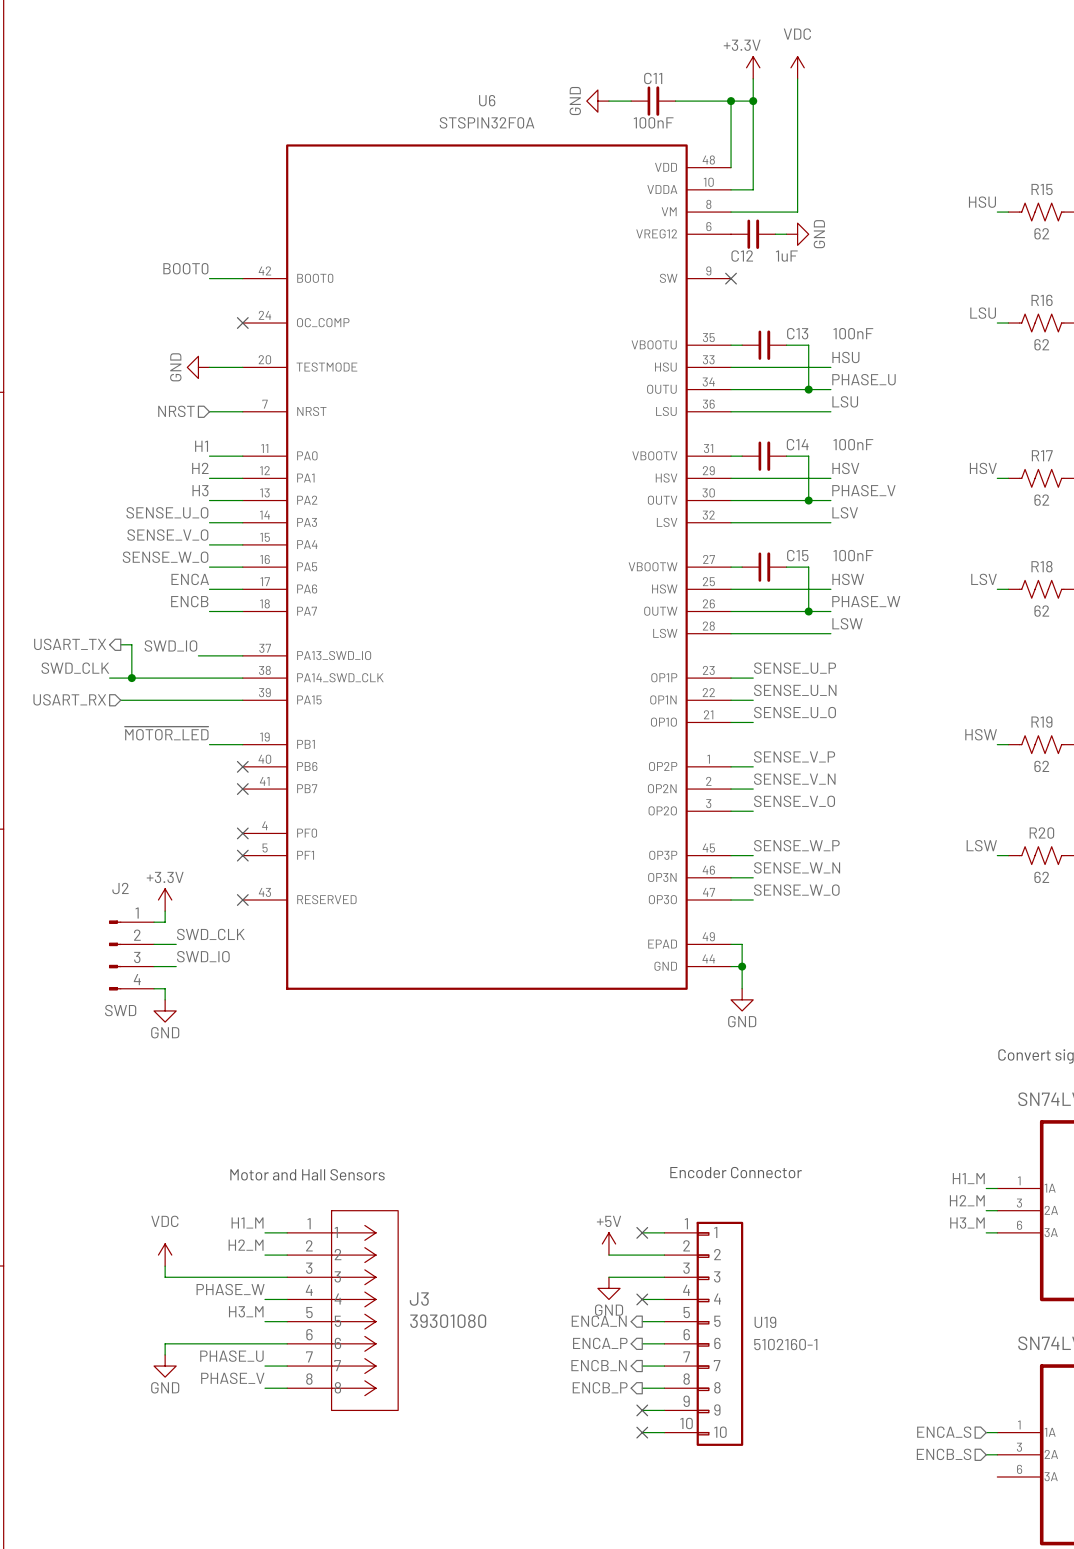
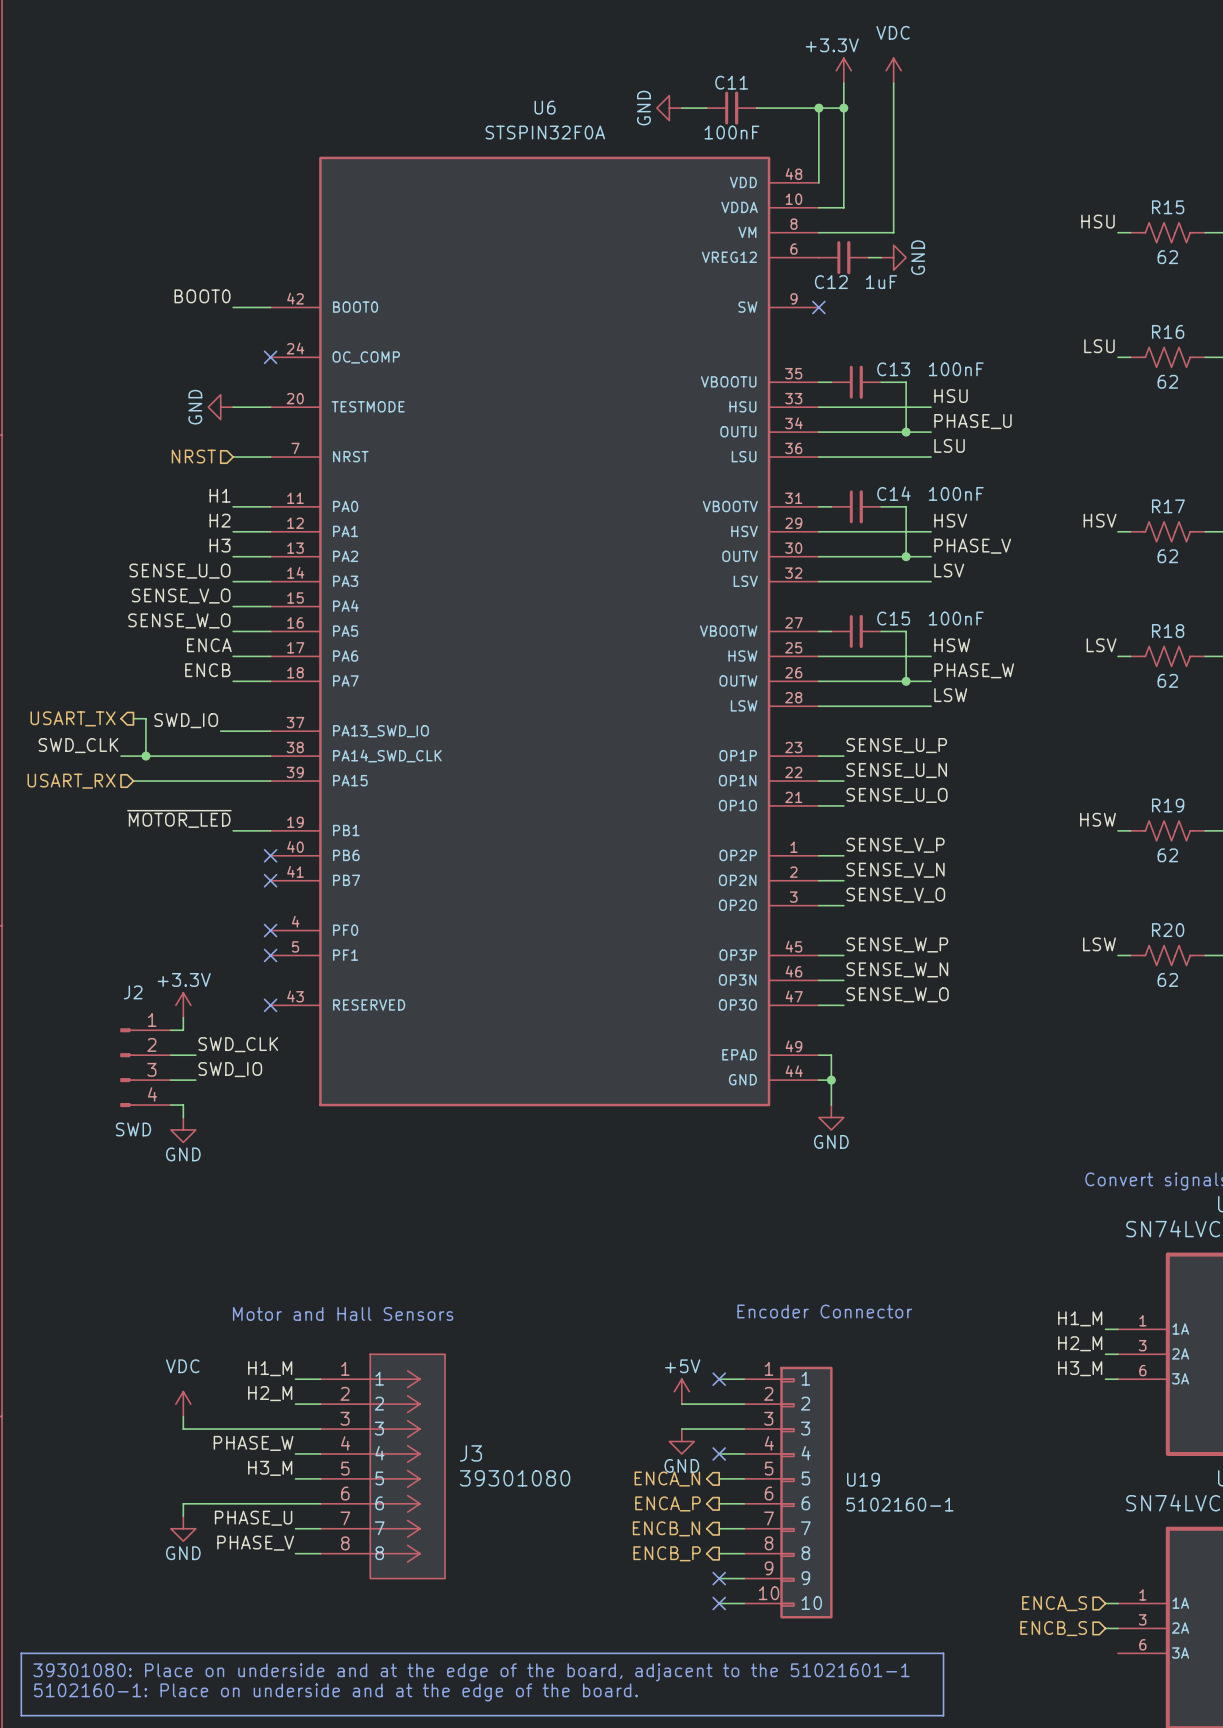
line: none -> (21, 1653) (943, 1653) (943, 1715) (21, 1715) (21, 1653)
text: none -> 39301080: Place on underside and at the edge of the board, adjacent to the 51021601-1 (471, 1672)
text: none -> 5102160-1: Place on underside and at the edge of the board. (335, 1692)

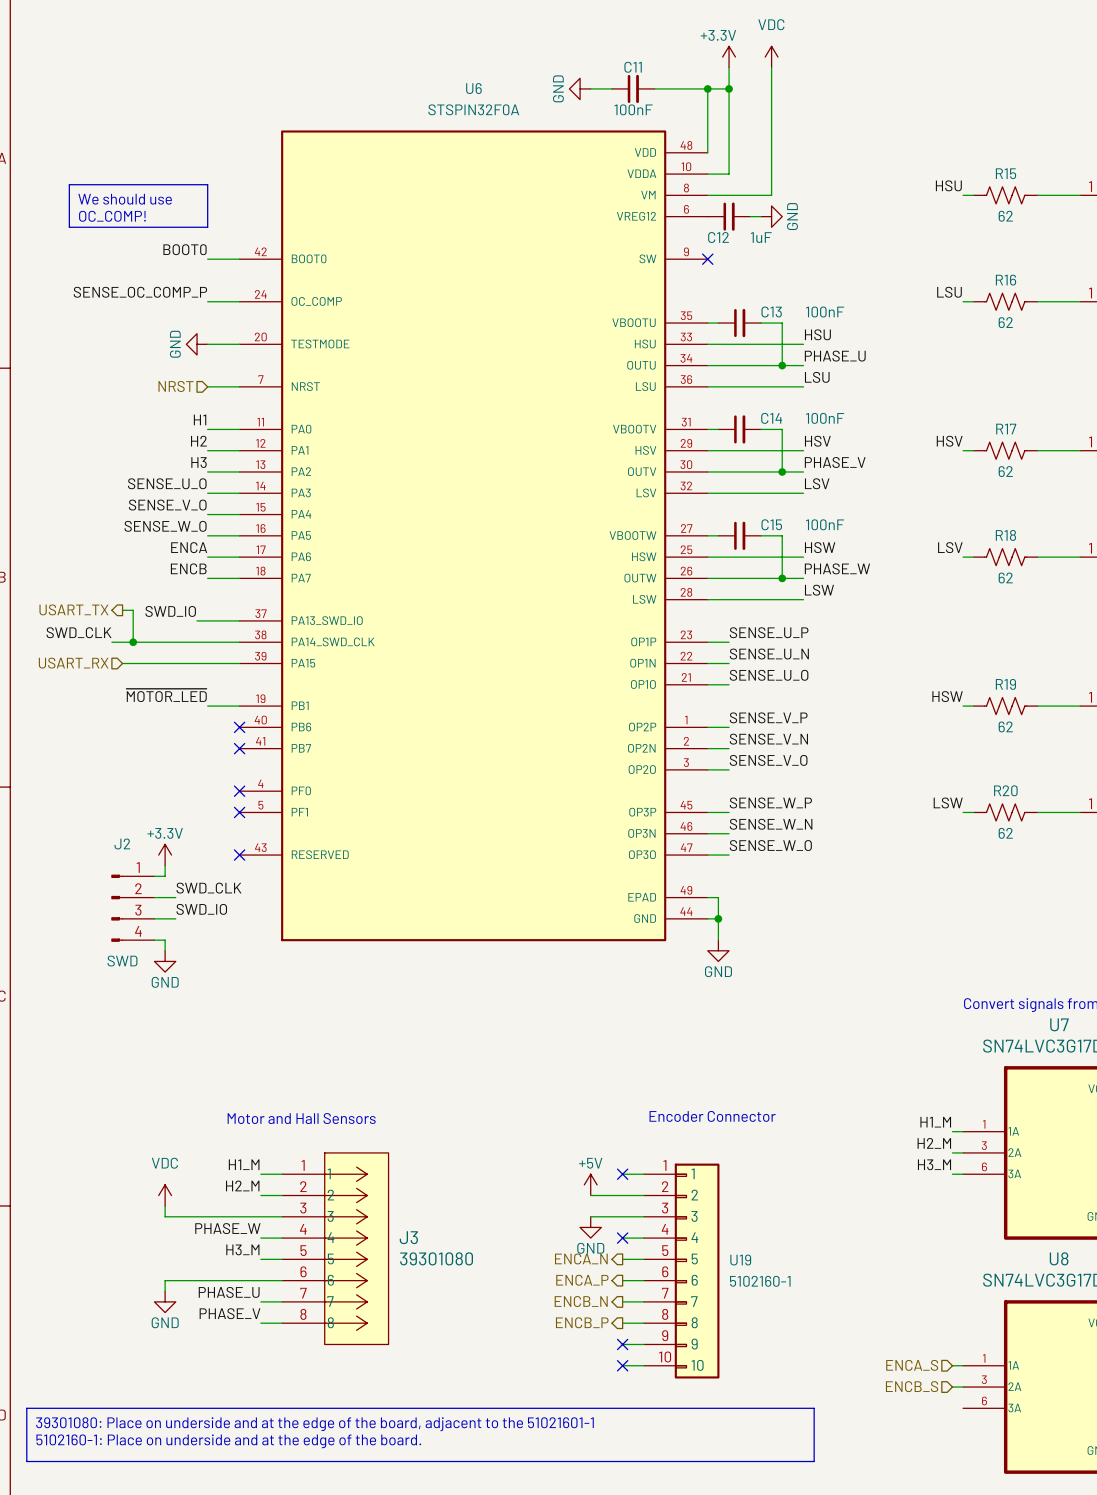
line: none -> (69, 184) (207, 184) (207, 227) (69, 227) (69, 184)
text: none -> We should use (125, 199)
text: none -> OC_COMP! (112, 216)
label: none -> SENSE_OC_COMP_P (140, 292)
wire: none -> (207, 301) (239, 301)
no-connect mark: (270, 357) -> none

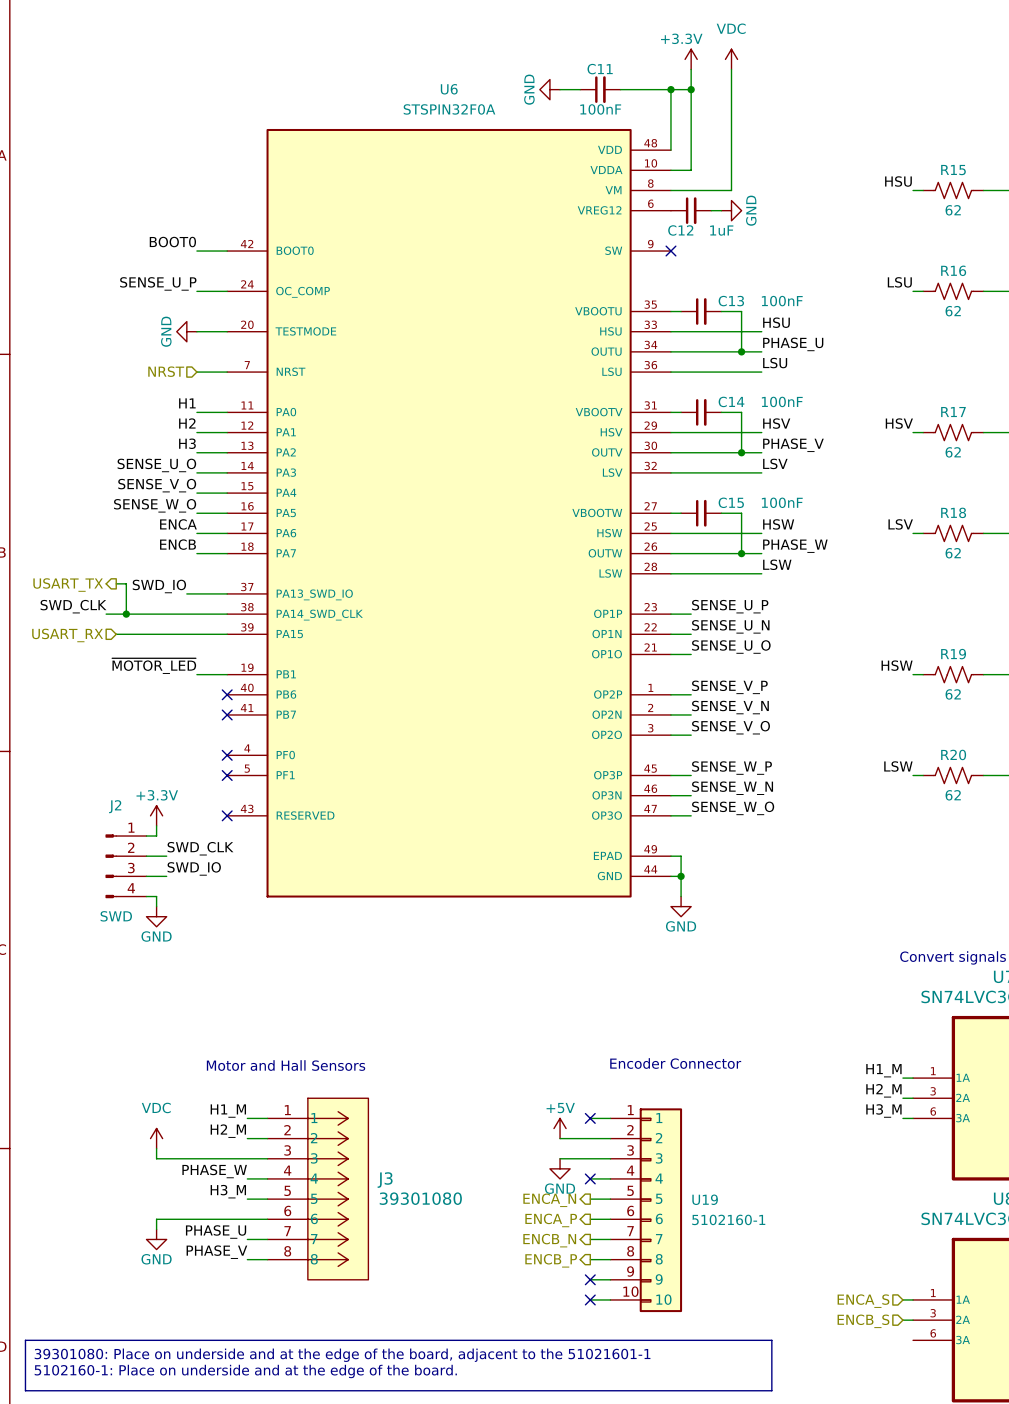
line: (69, 184) (207, 184) (207, 227) (69, 227) (69, 184) -> none
text: We should use (125, 199) -> none
text: OC_COMP! (112, 216) -> none
label: SENSE_OC_COMP_P (140, 292) -> SENSE_U_P (158, 283)

